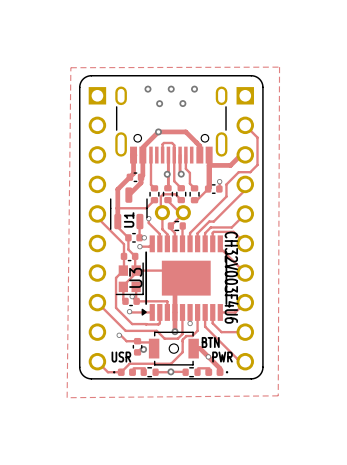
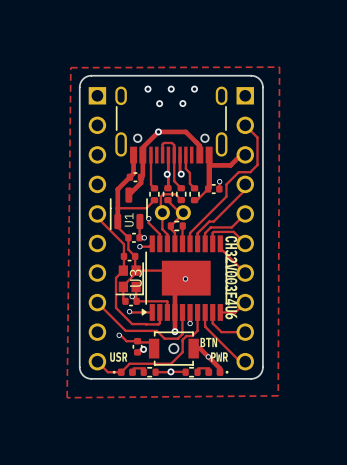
via: none -> (185, 278)

